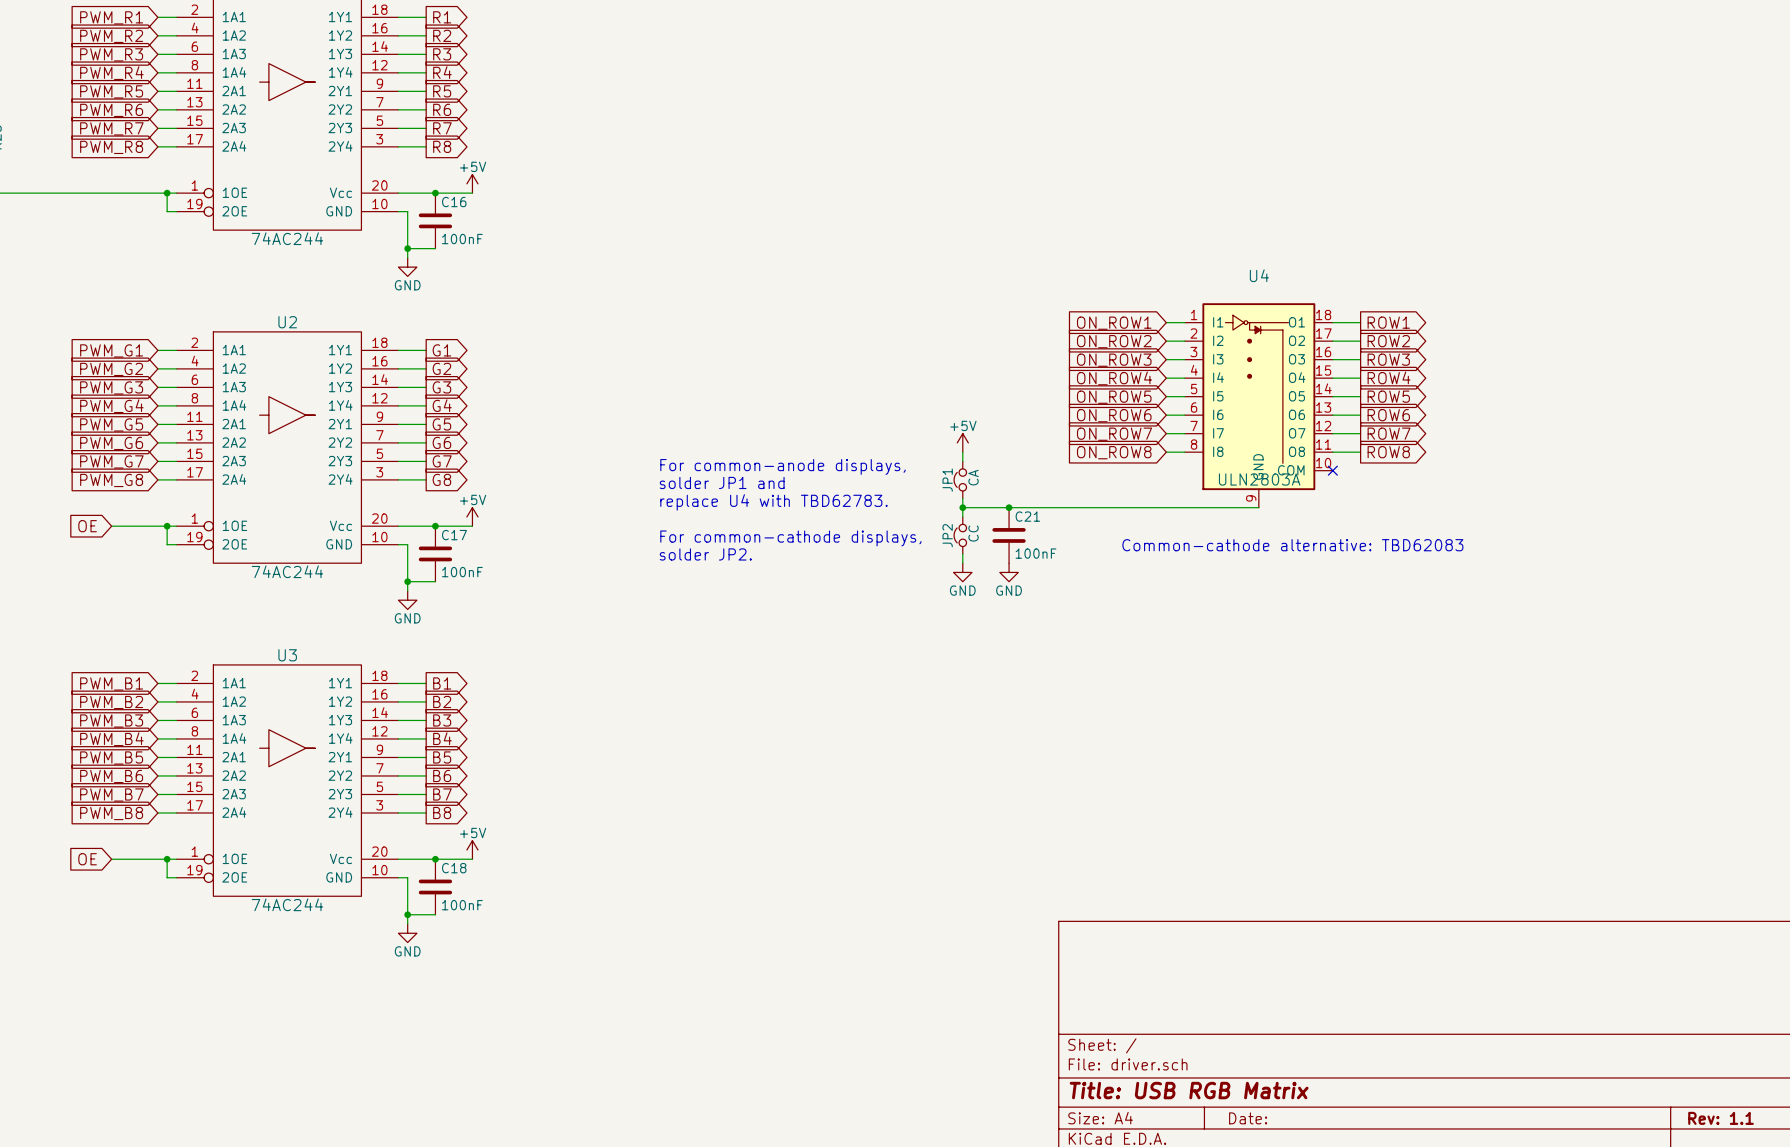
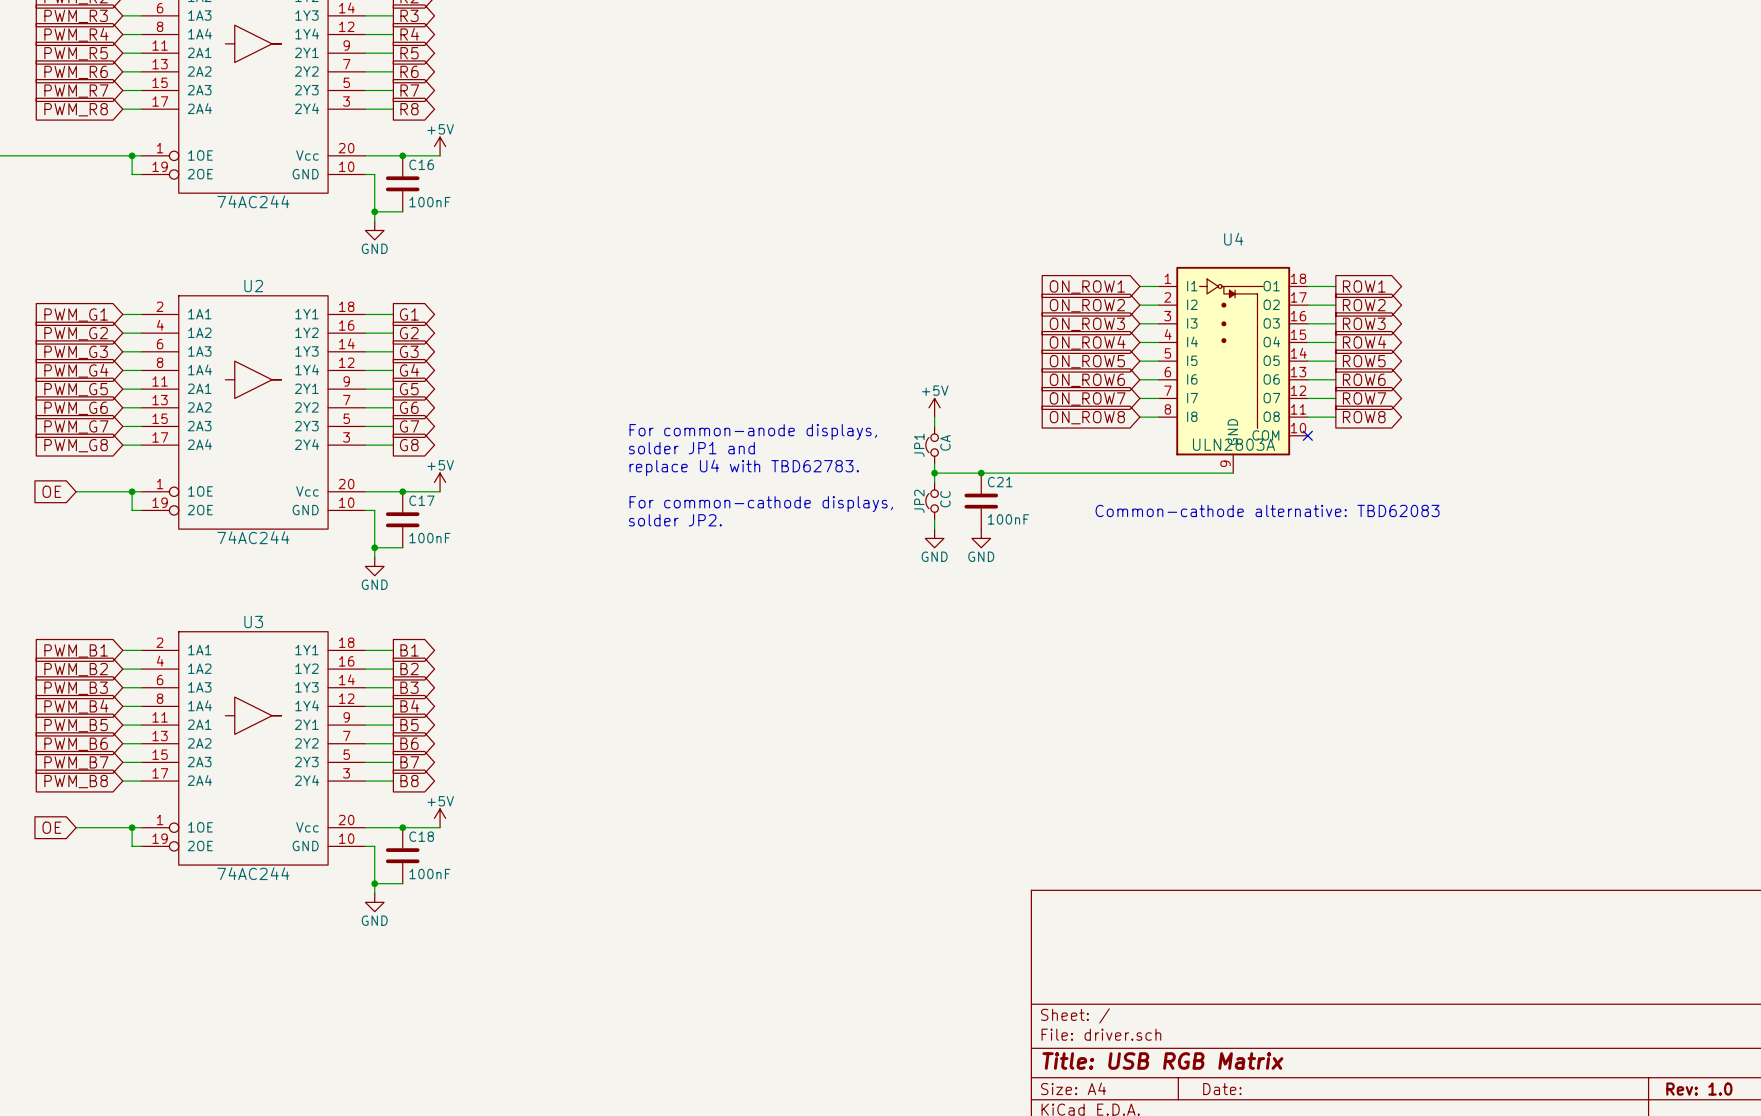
title block: Rev: 1.1 (1721, 1118) -> Rev: 1.0 (1699, 1089)

